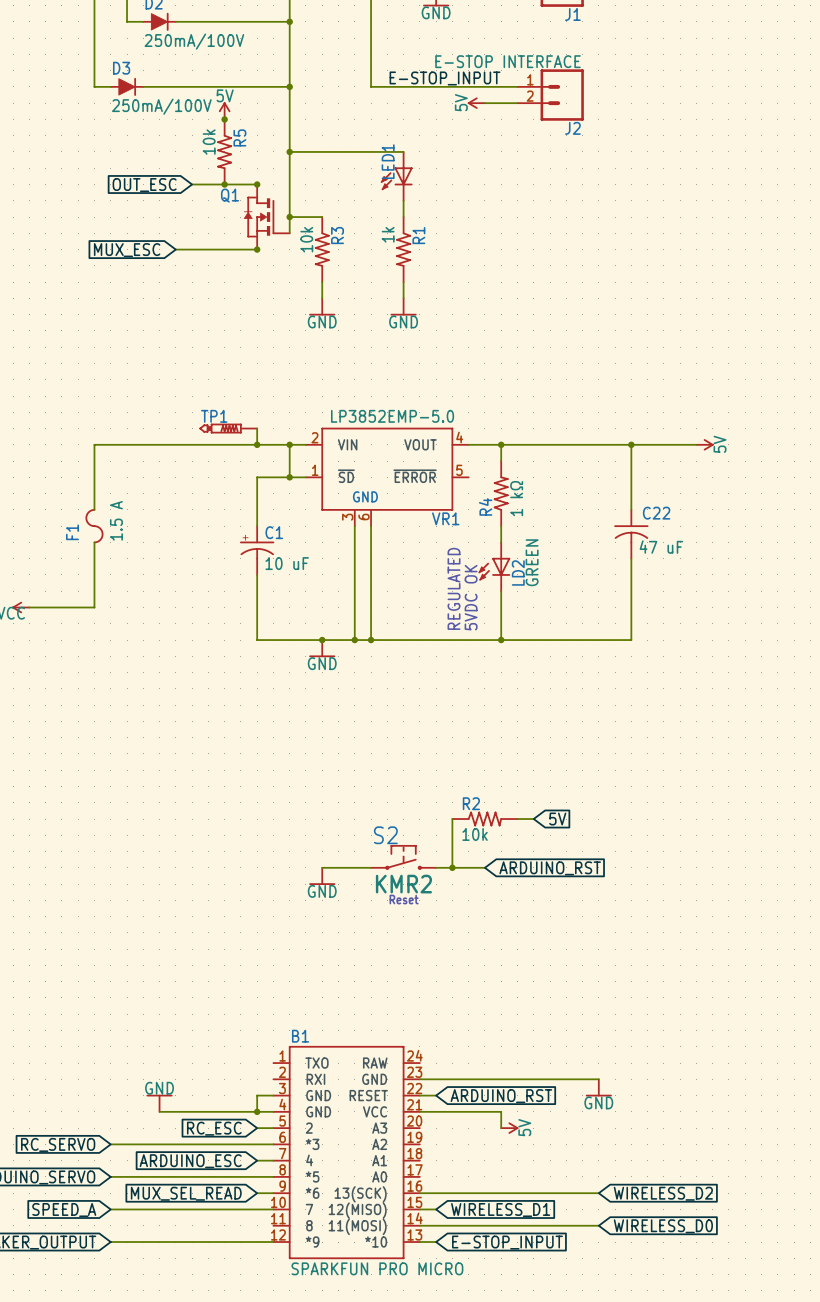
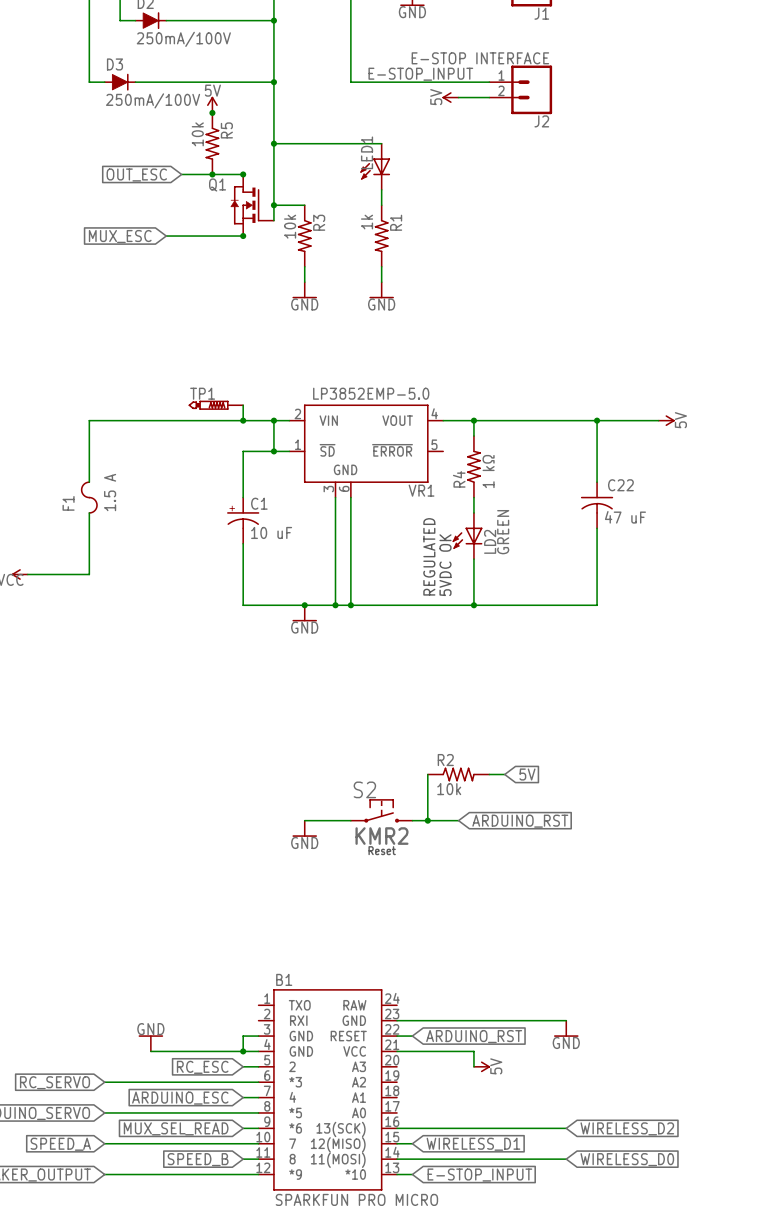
wire: none -> (243, 1159) (258, 1159)
global label: none -> SPEED_B (198, 1159)

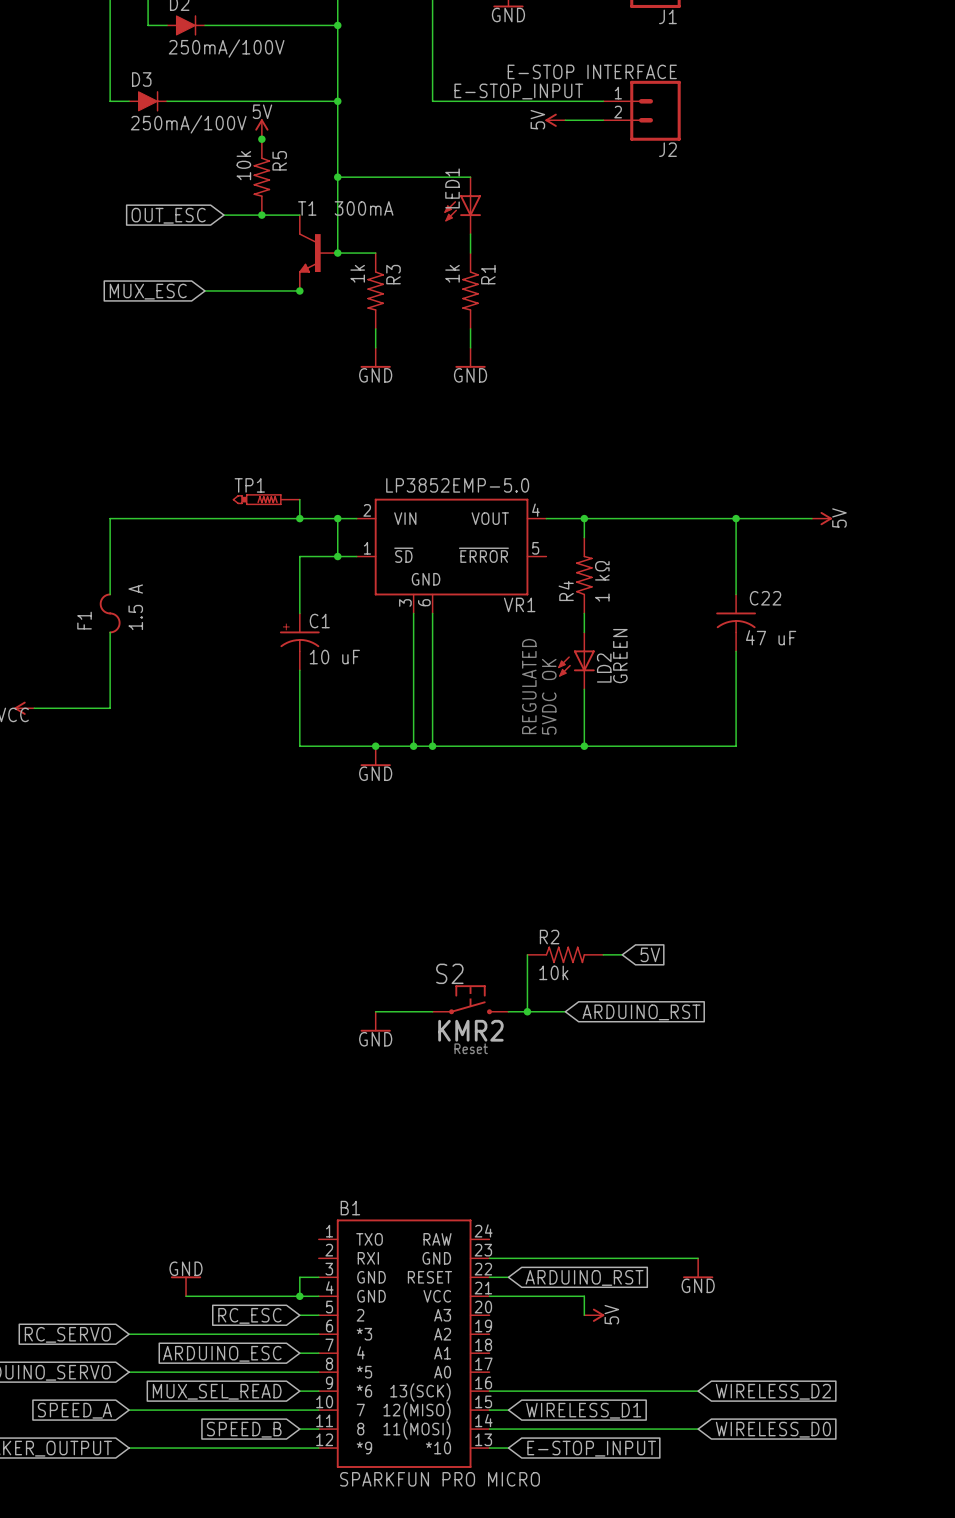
junction: (243, 174) -> none
Q1: (252, 205) -> none
T1: none -> 300mA (318, 253)
wire: (273, 205) (273, 220) -> none
R3 value: 10k (290, 226) -> 1k (357, 273)

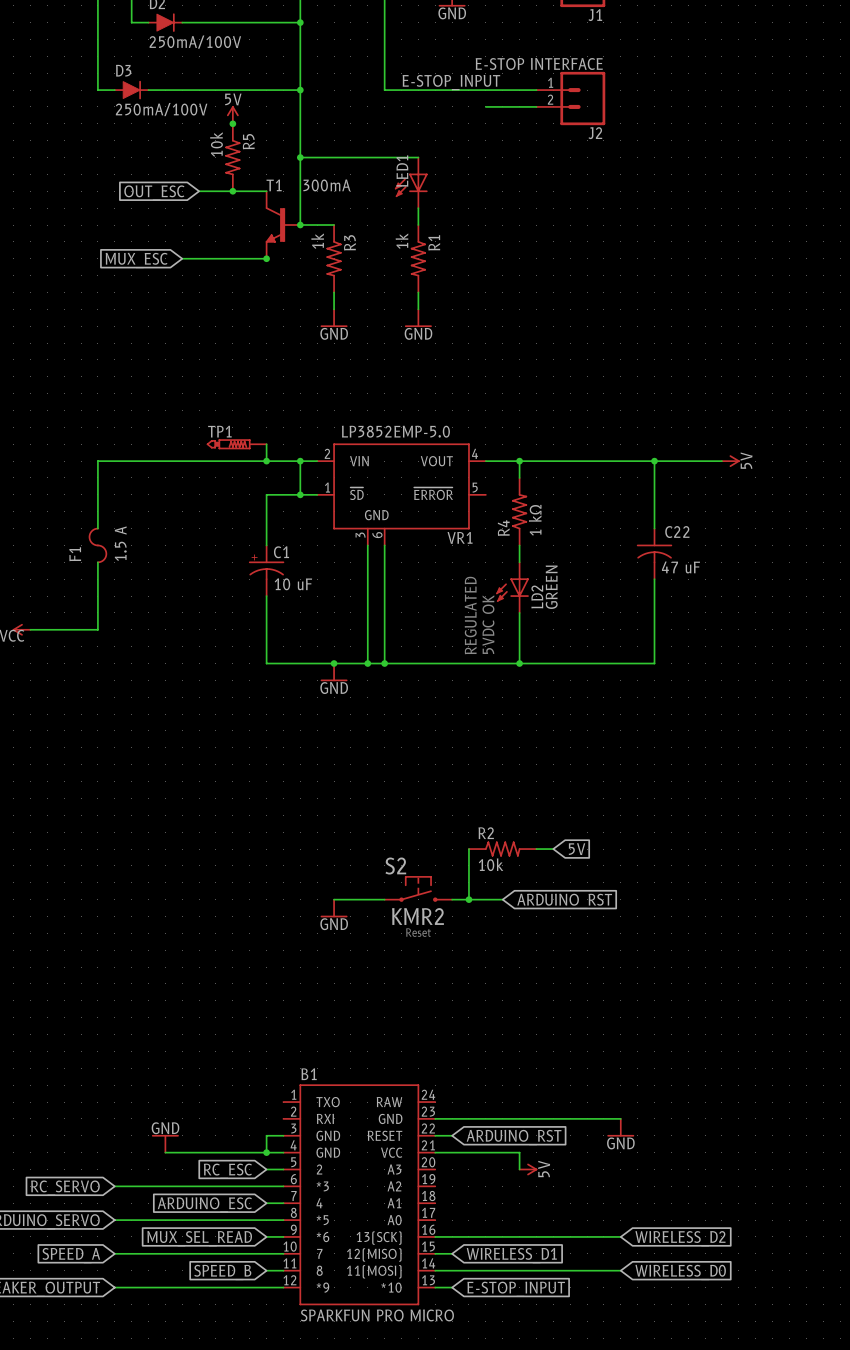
power symbol: 5V (555, 120) -> none

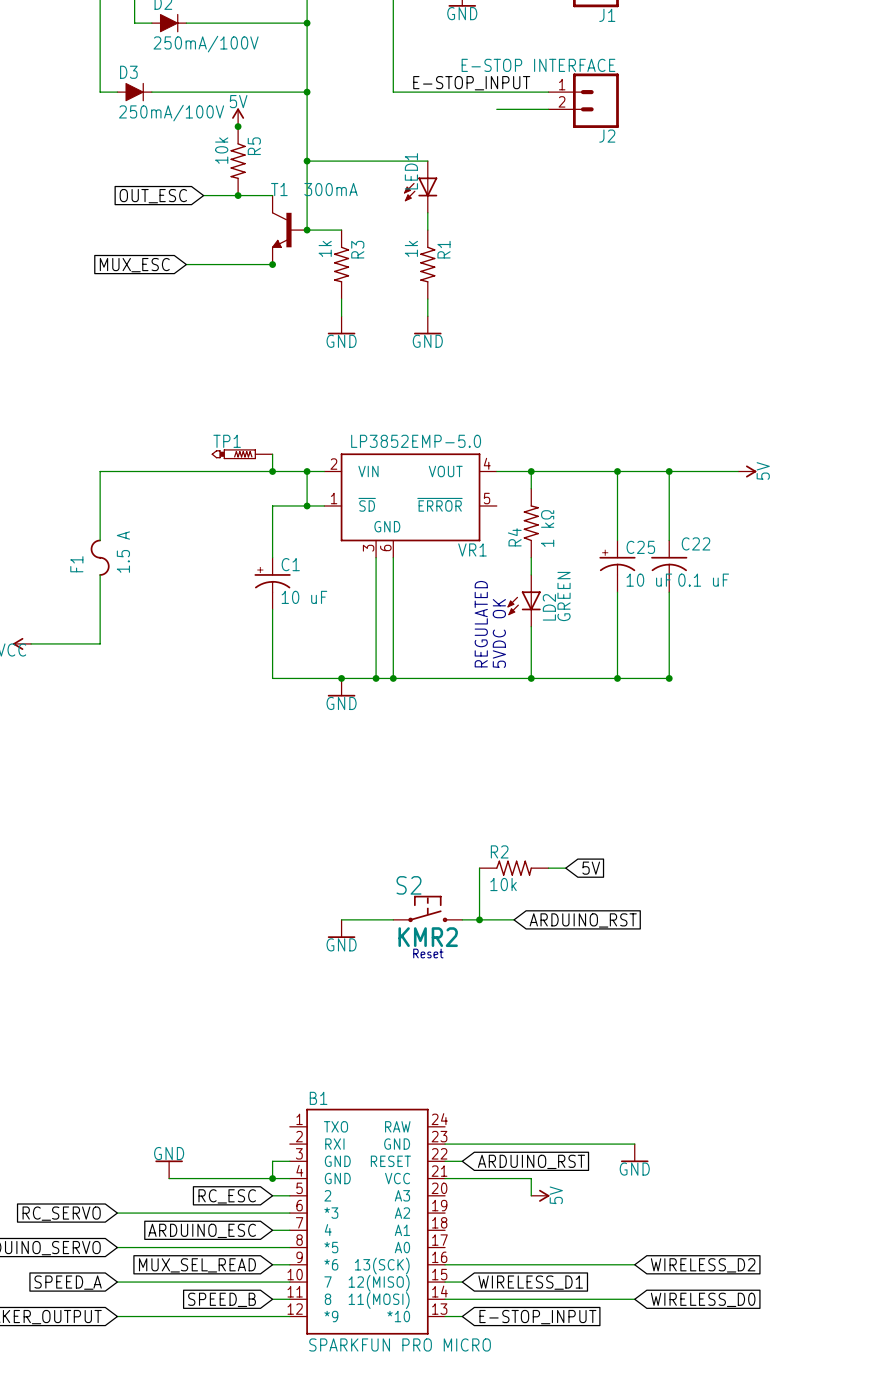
wire: none -> (617, 471) (617, 540)
junction: none -> (617, 471)
C25: none -> 10 uF (617, 566)
C22 value: 47 uF (680, 567) -> 0.1 uF (703, 580)
wire: none -> (617, 592) (617, 678)
junction: none -> (617, 678)
junction: none -> (669, 678)

